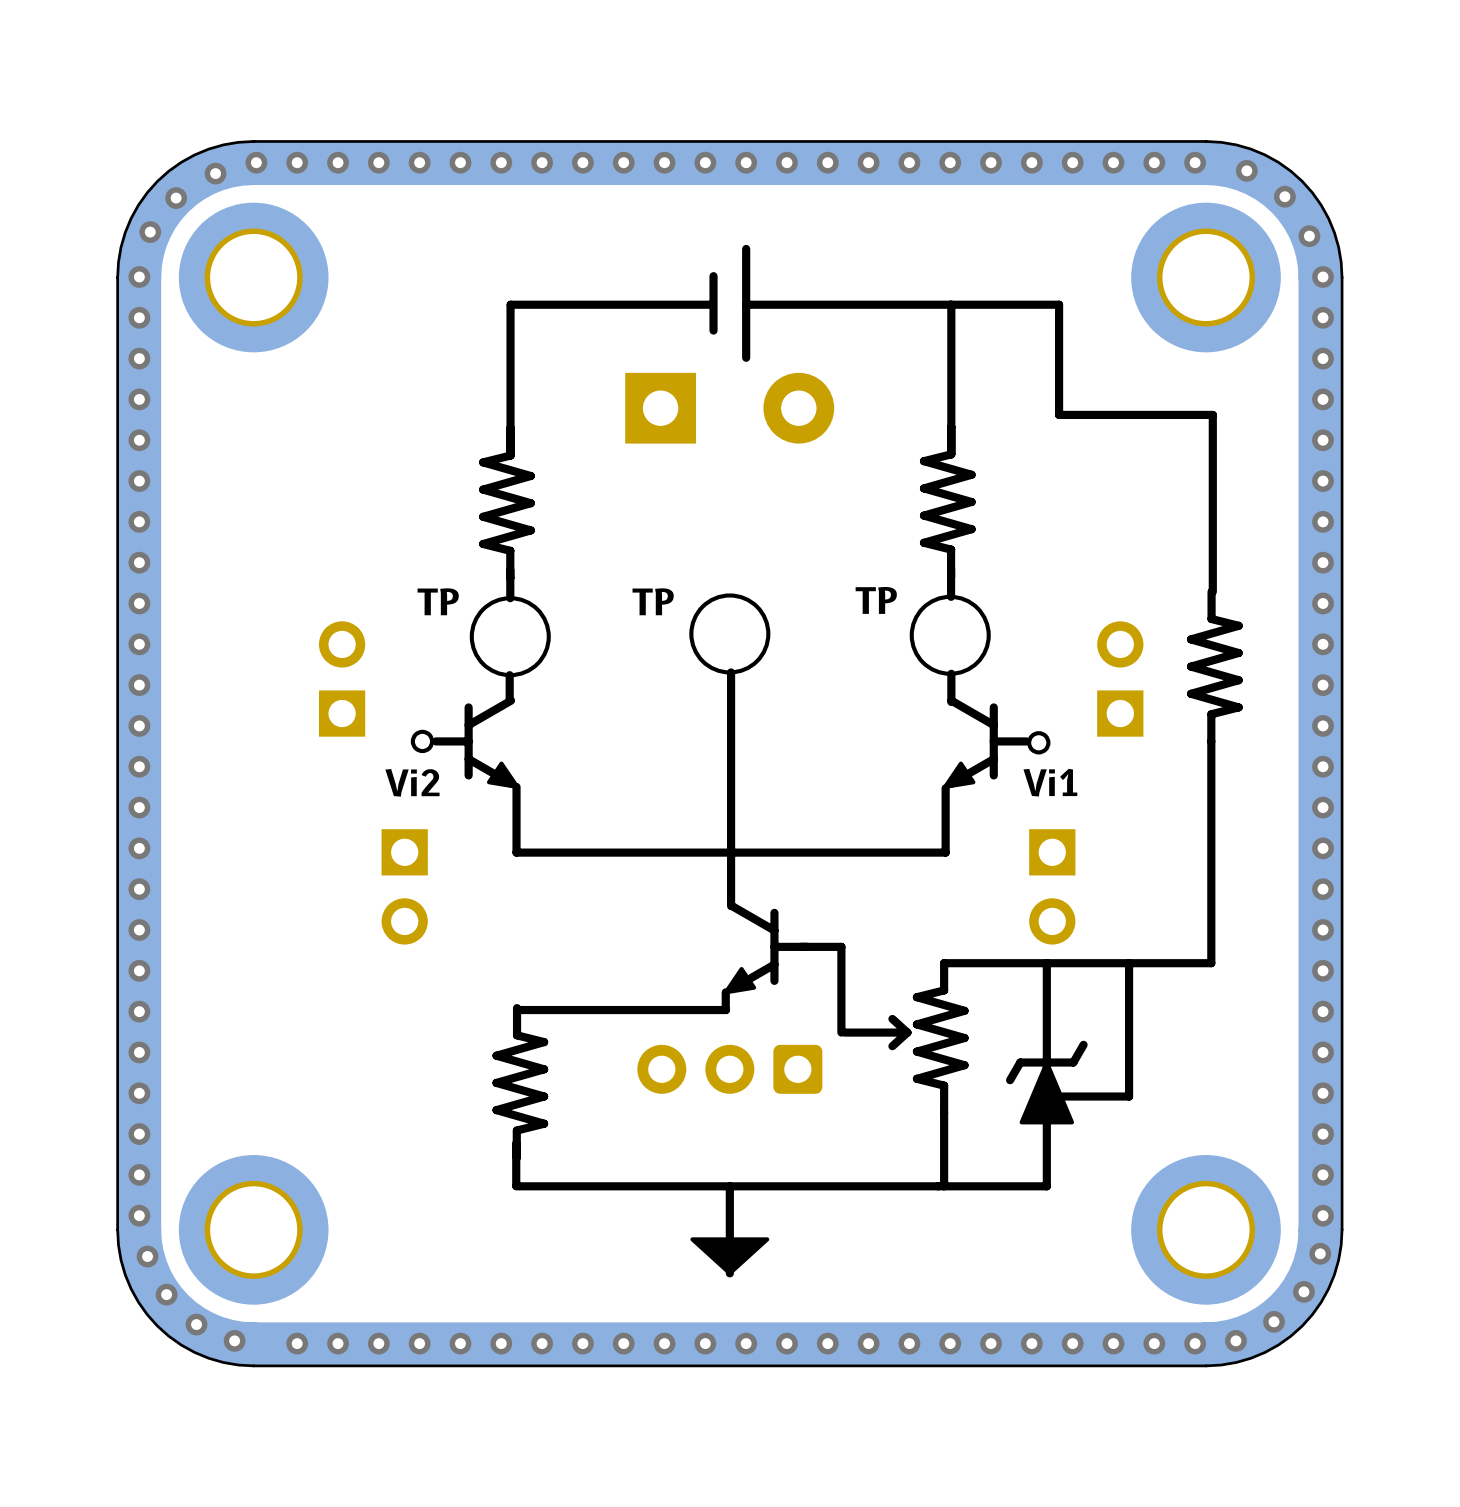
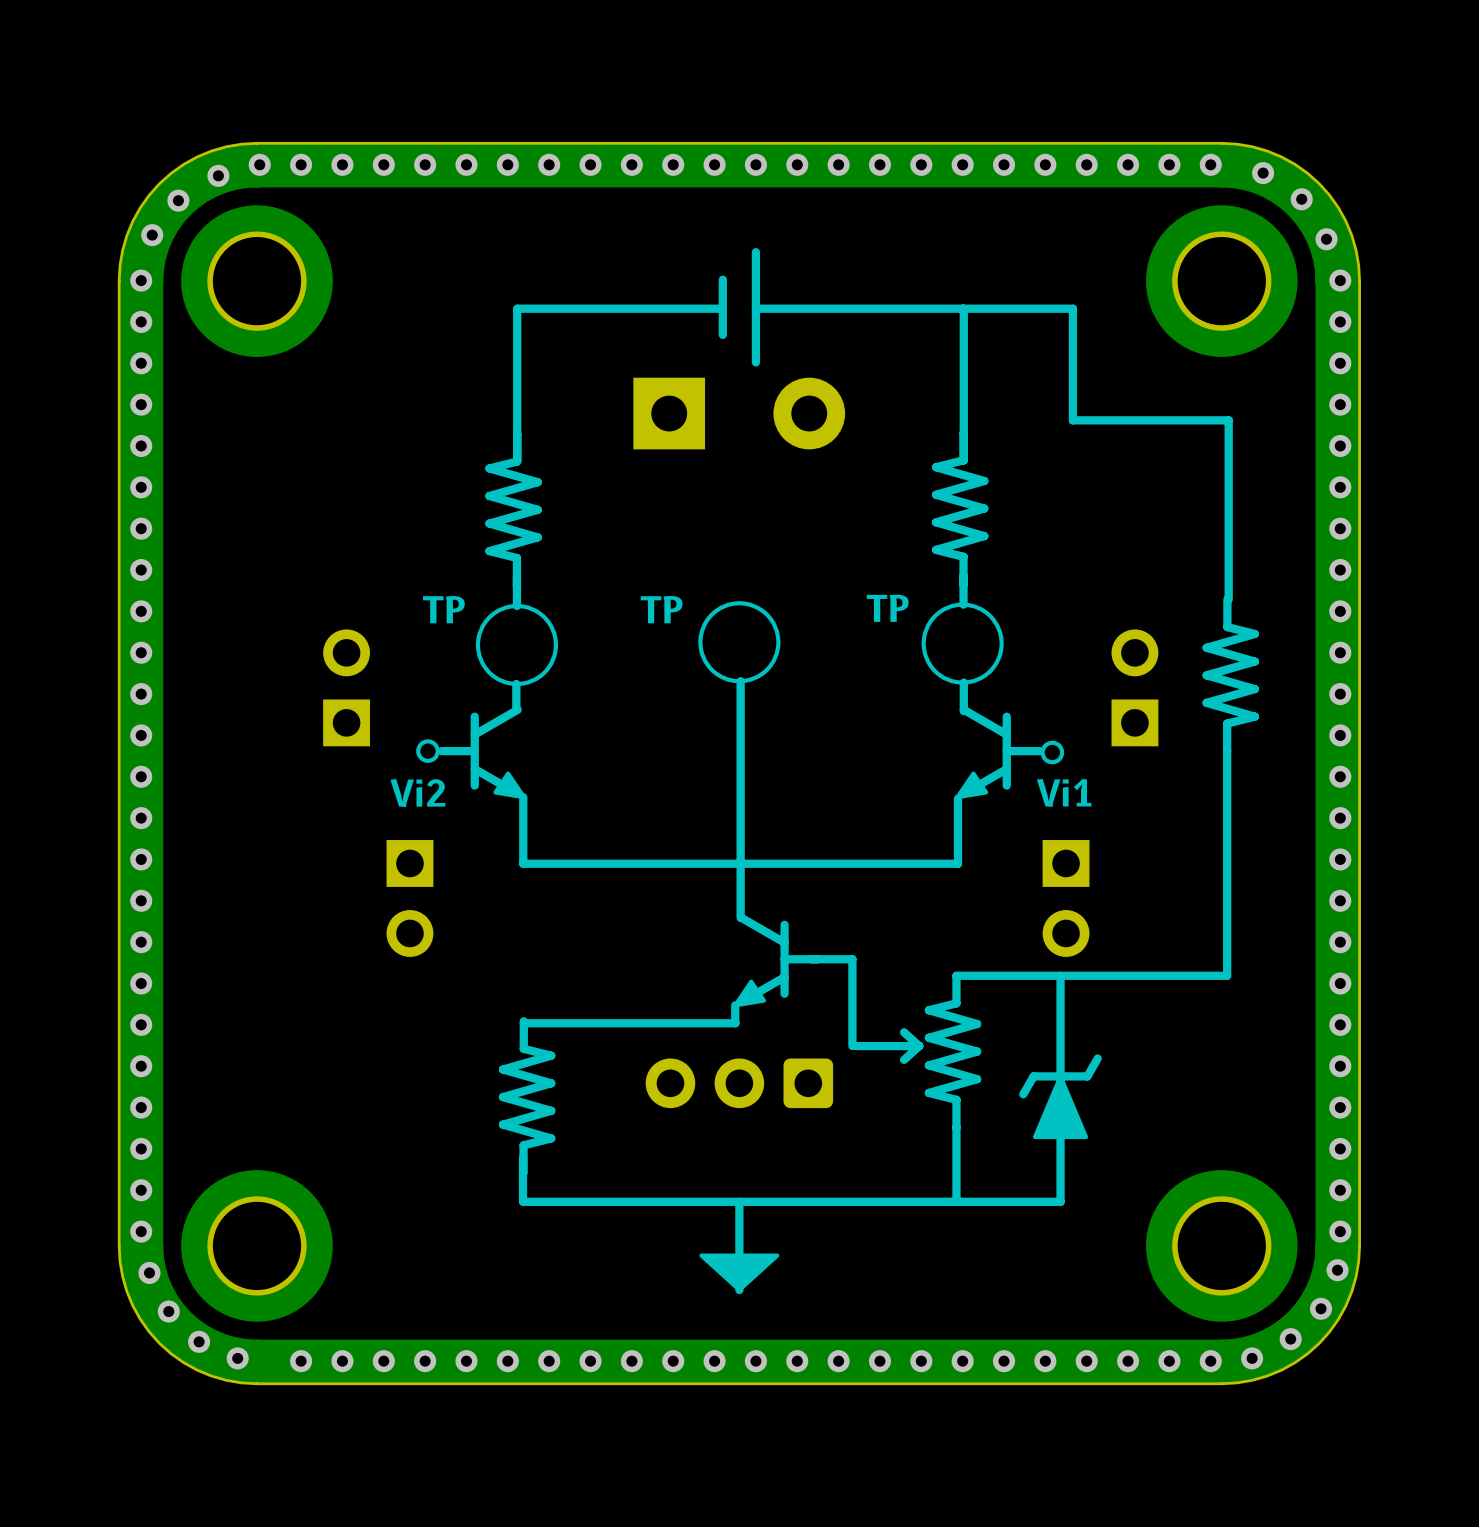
line: (1129, 963) (1129, 1096) (1048, 1096) -> none

